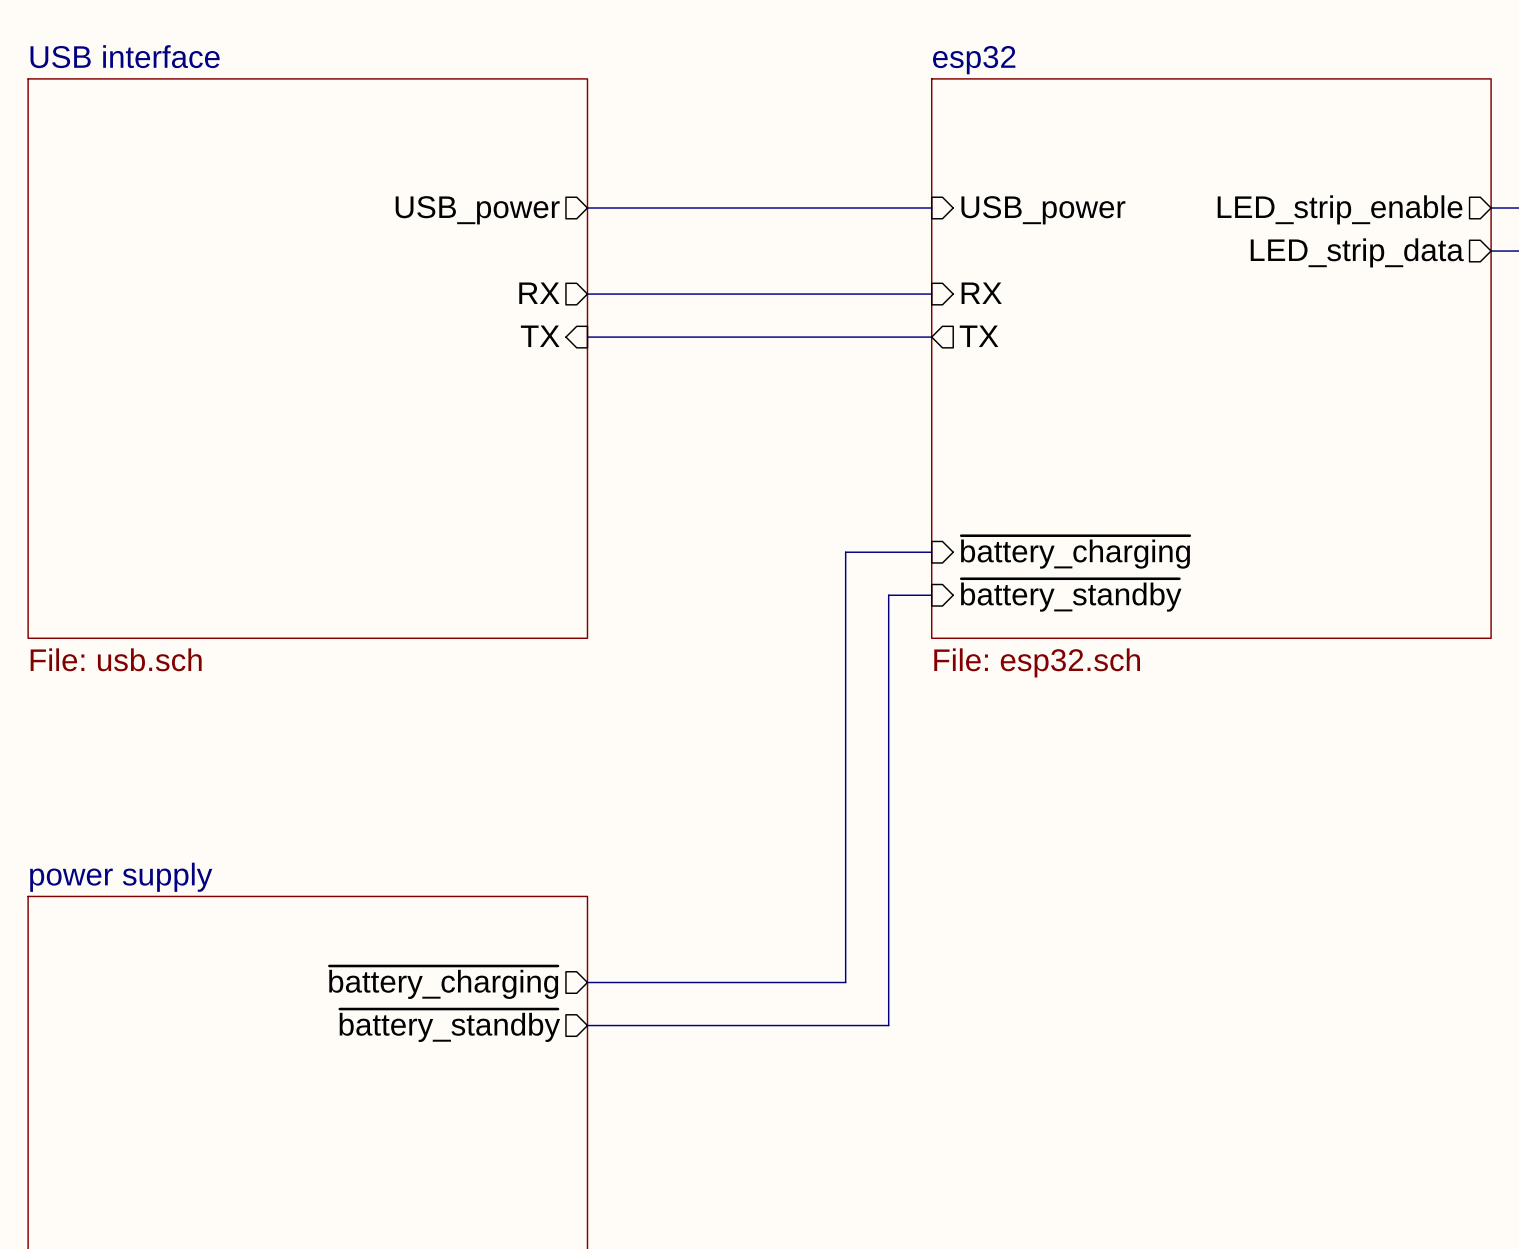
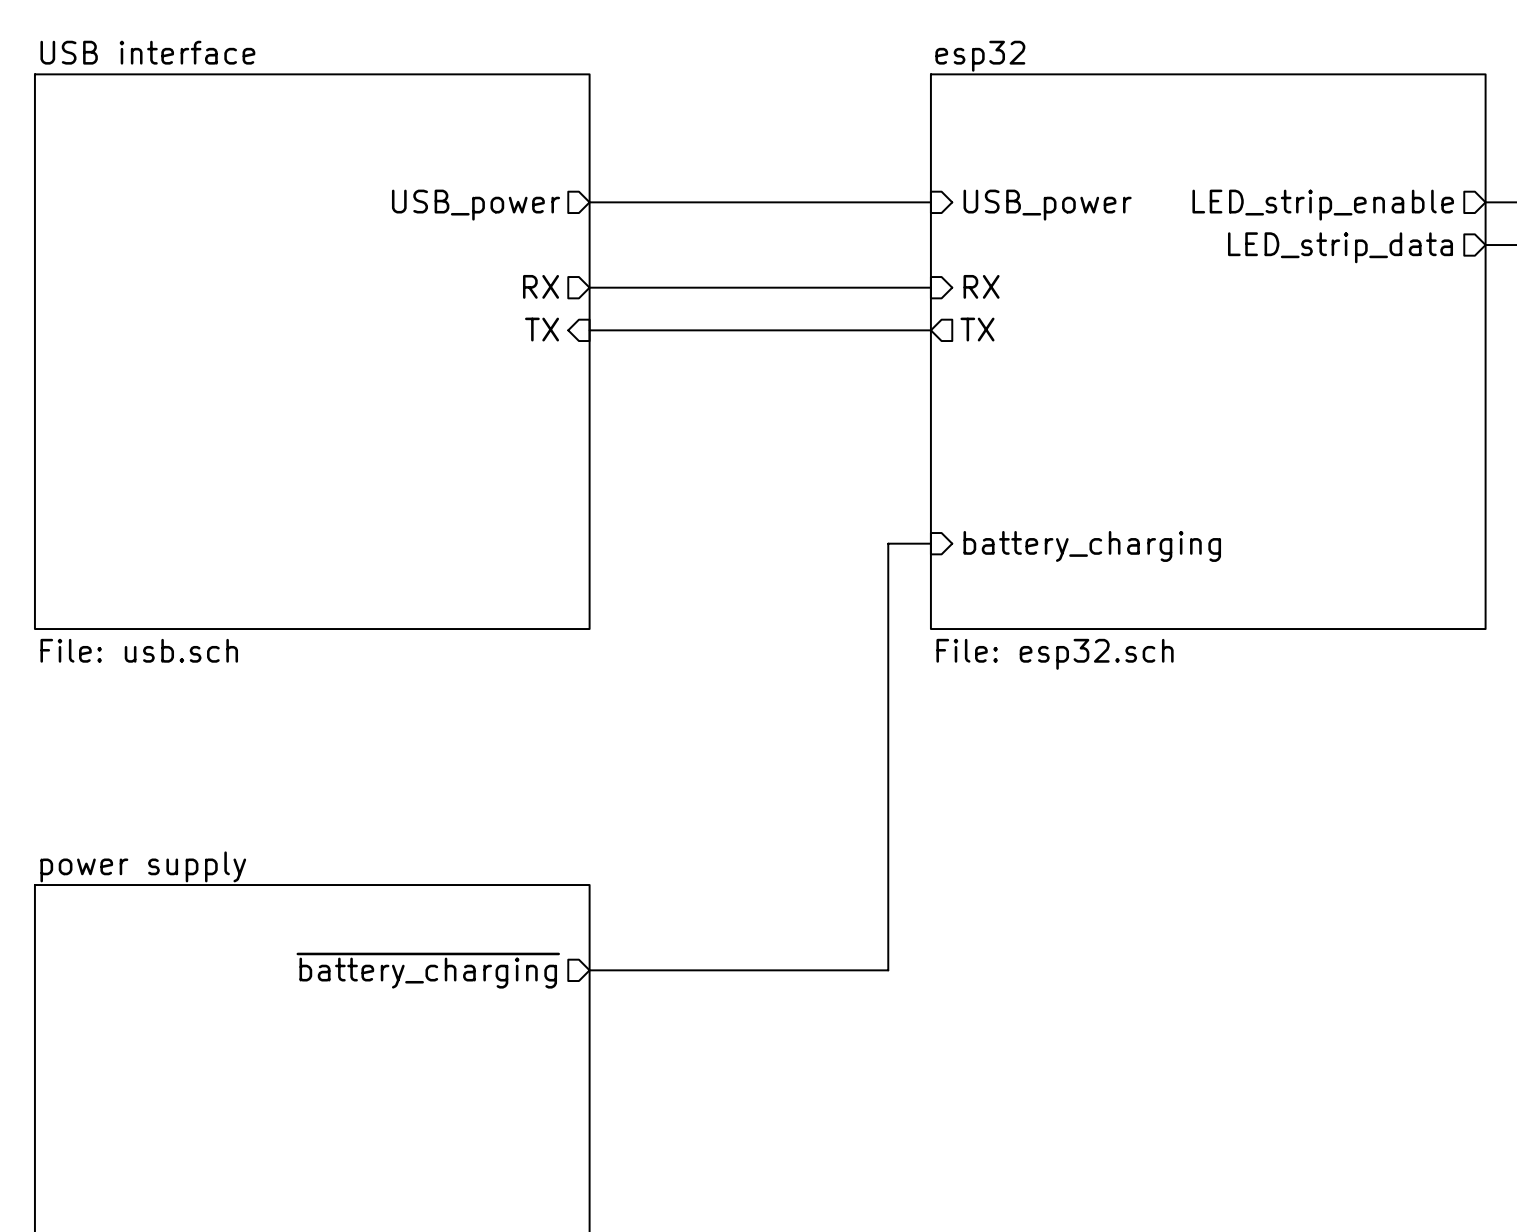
wire: (888, 552) (845, 552) (845, 982) -> none
sheet pin: ~{battery_charging} (1075, 552) -> battery_charging (1092, 546)
wire: (888, 595) (931, 595) -> (888, 586) (888, 543)
sheet pin: ~{battery_standby} (1071, 595) -> none
wire: (888, 982) (888, 1025) (587, 1025) -> (888, 970) (845, 970)
sheet pin: ~{battery_standby} (449, 1025) -> none

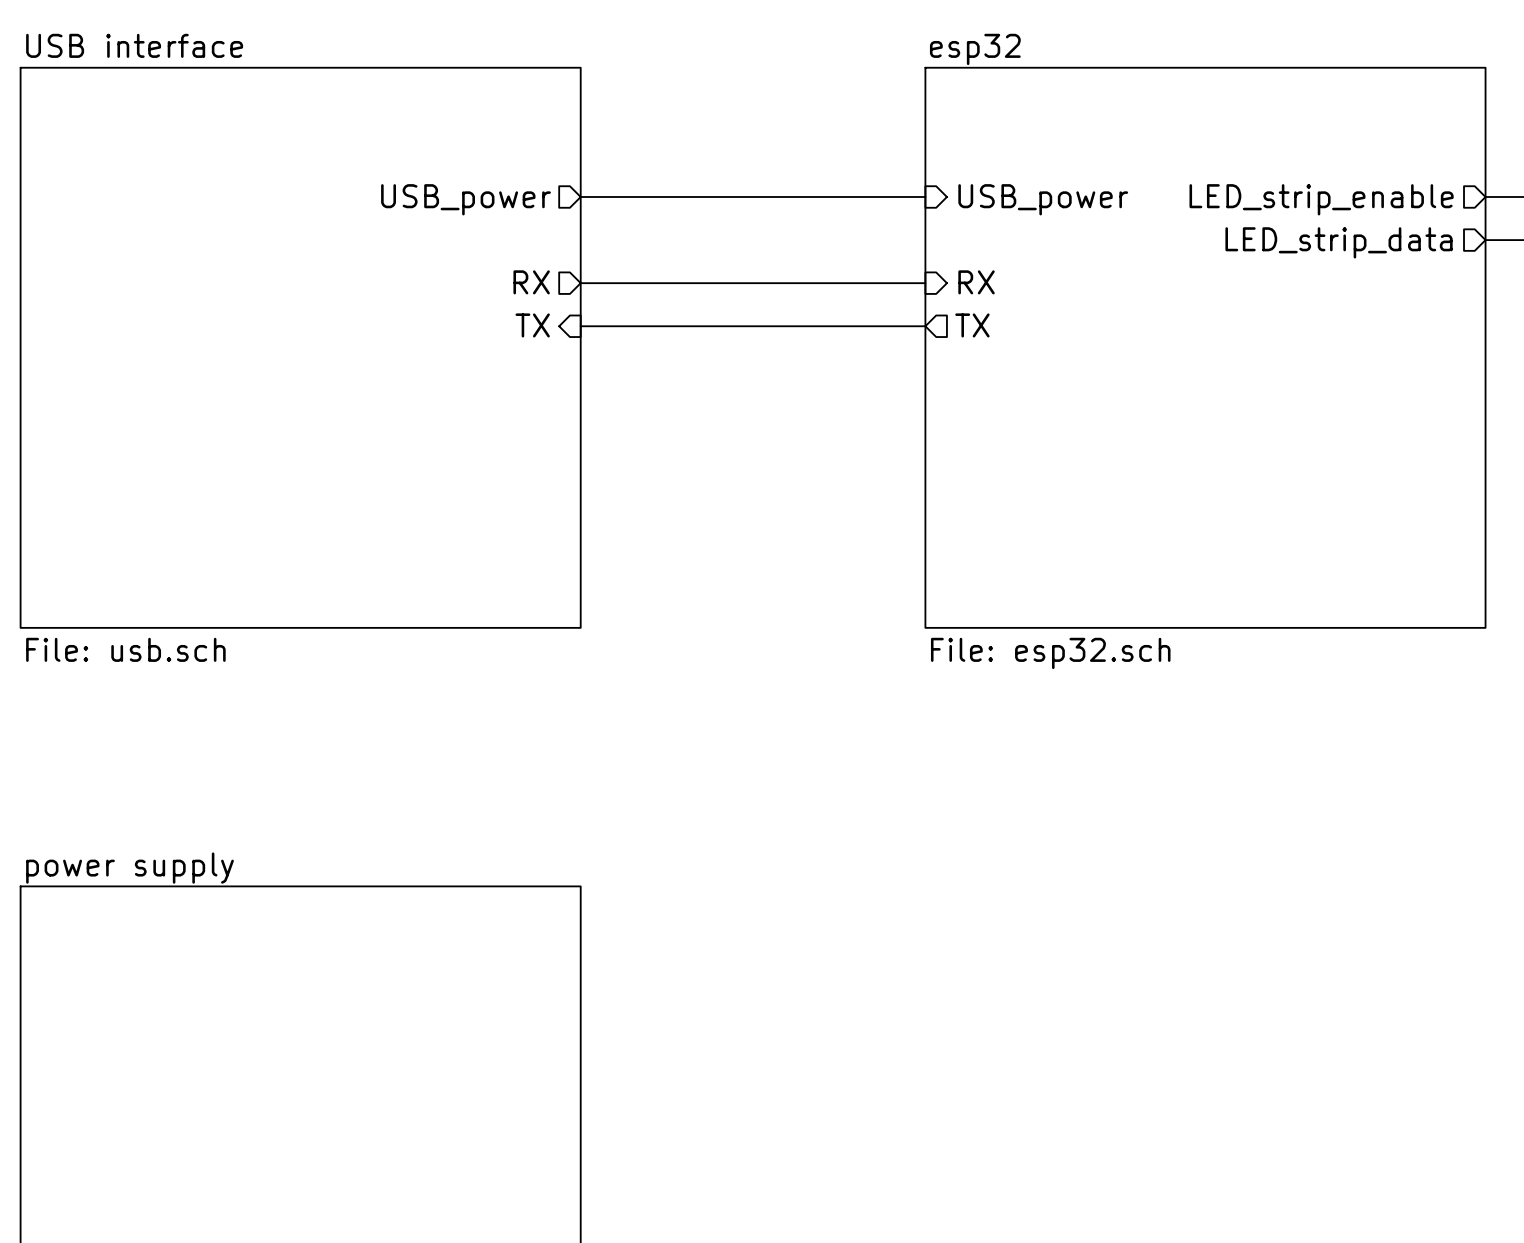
wire: (930, 543) (888, 543) (888, 970) (589, 970) -> none
sheet pin: battery_charging (1092, 546) -> none
sheet pin: ~{battery_charging} (428, 970) -> none

